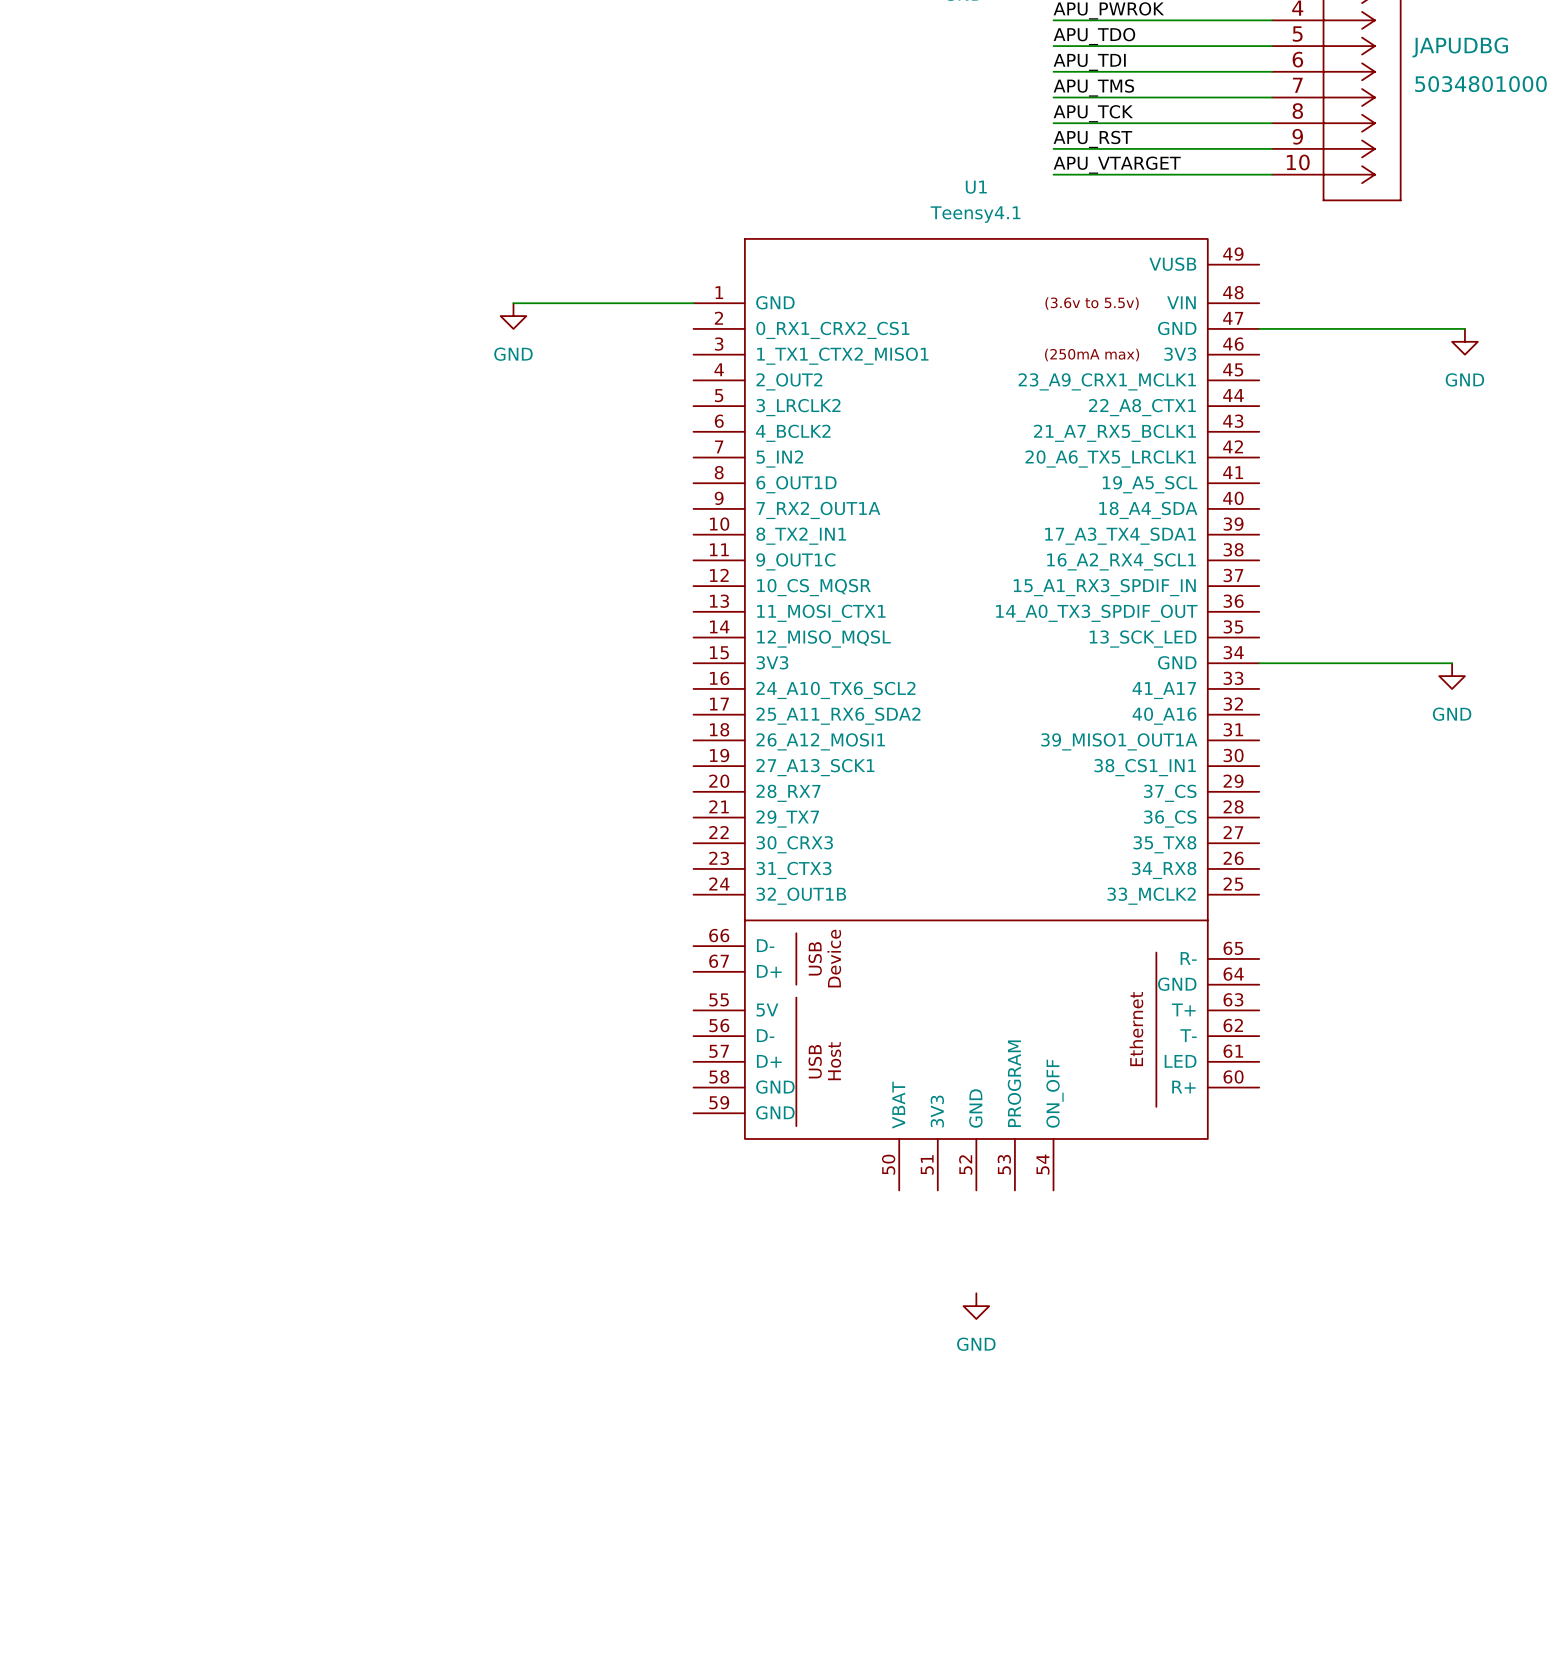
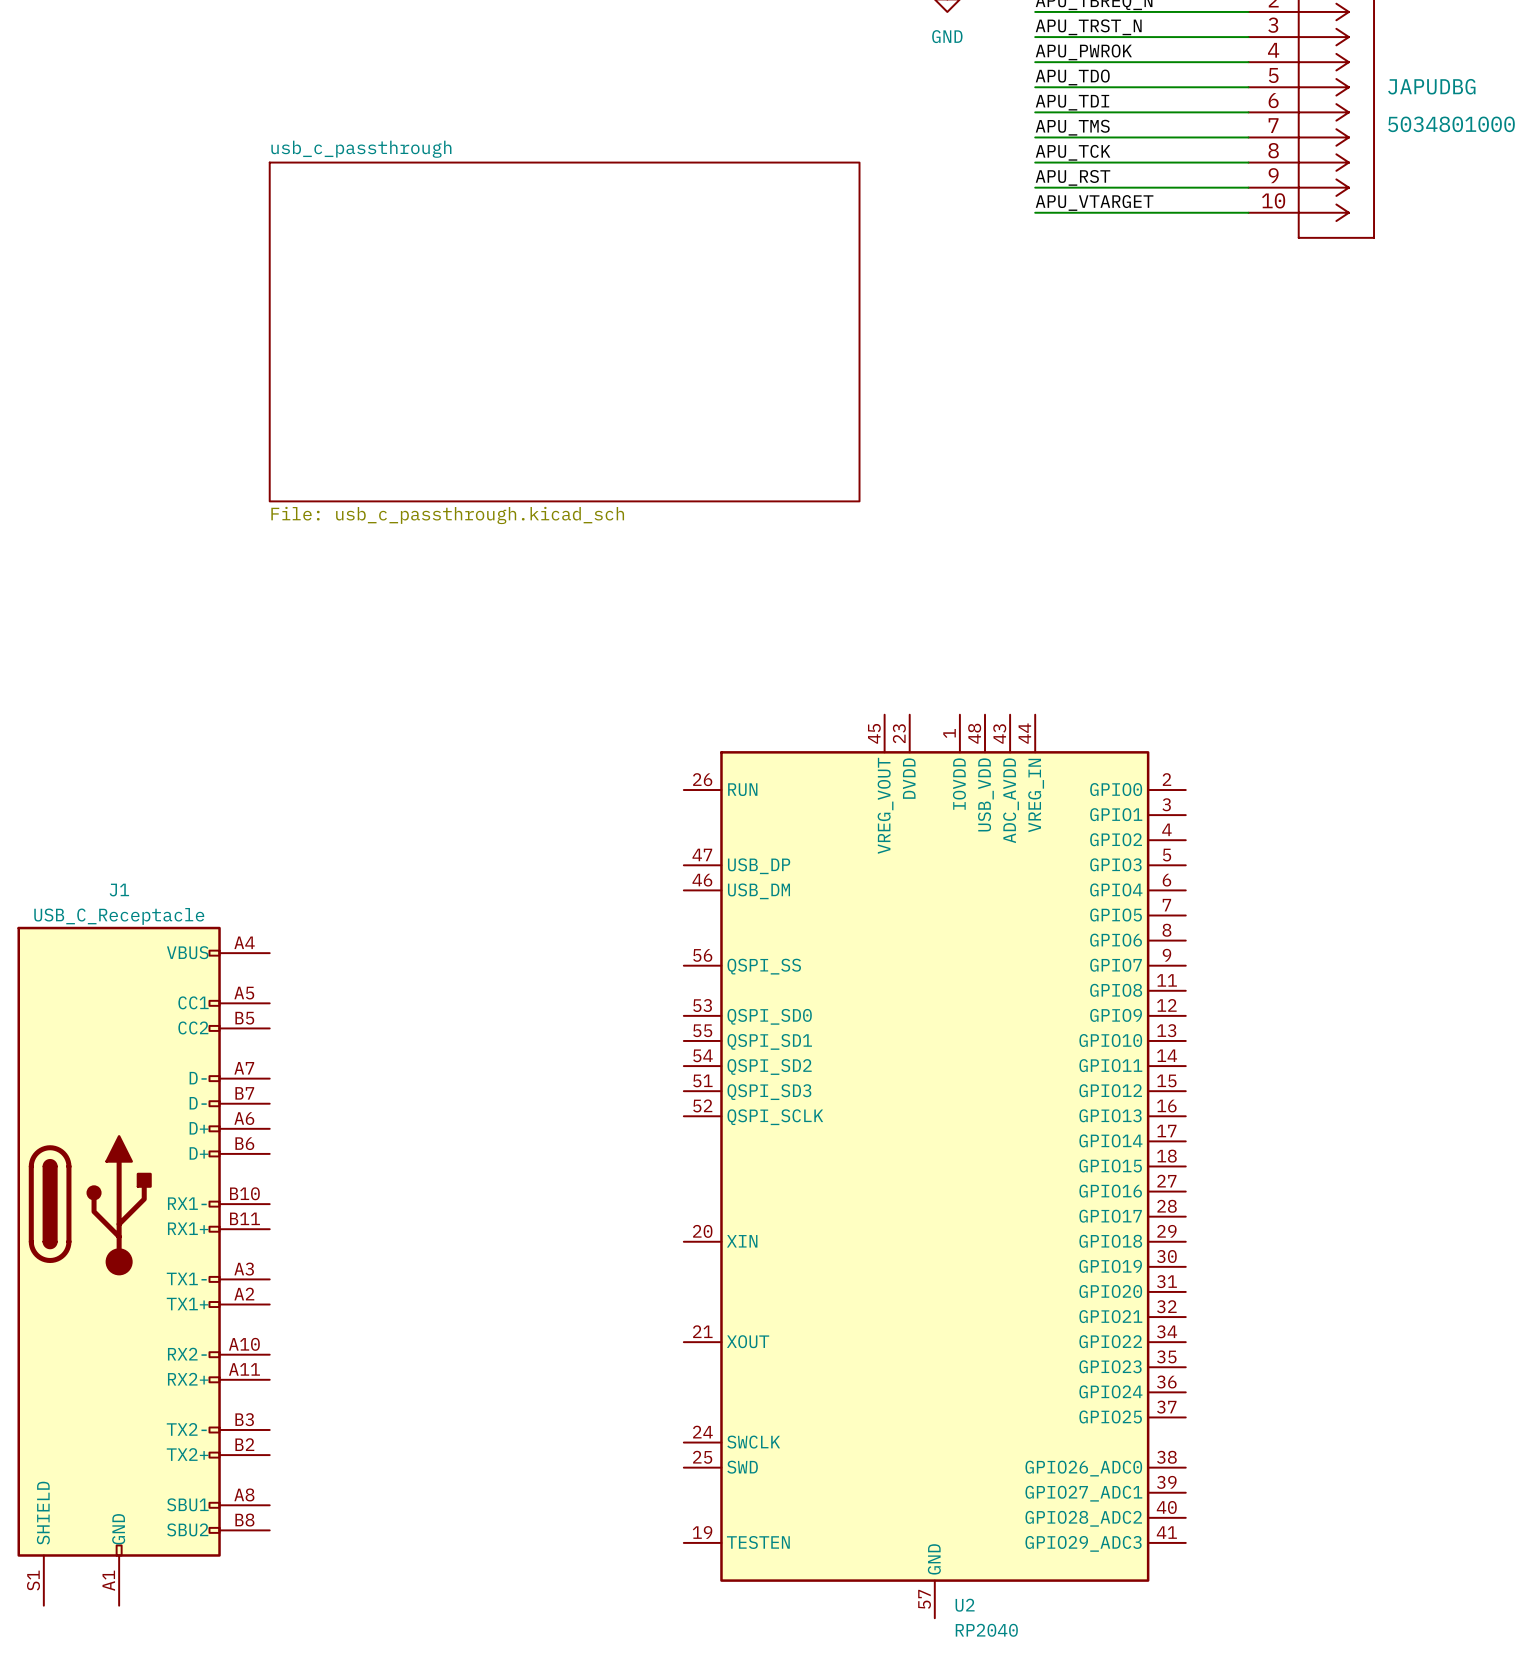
sheet usb_c_passthrough: none -> File: usb_c_passthrough.kicad_sch (564, 331)
wire: (513, 303) (693, 303) -> none
power symbol: GND (513, 316) -> none
wire: (1259, 328) (1464, 328) -> none
power symbol: GND (1464, 341) -> none
wire: (1259, 663) (1452, 663) -> none
power symbol: GND (1452, 676) -> none
U1: Teensy4.1 (976, 714) -> none
U2: none -> RP2040 (934, 1166)
J1: none -> USB_C_Receptacle (143, 1266)
power symbol: GND (976, 1306) -> none

